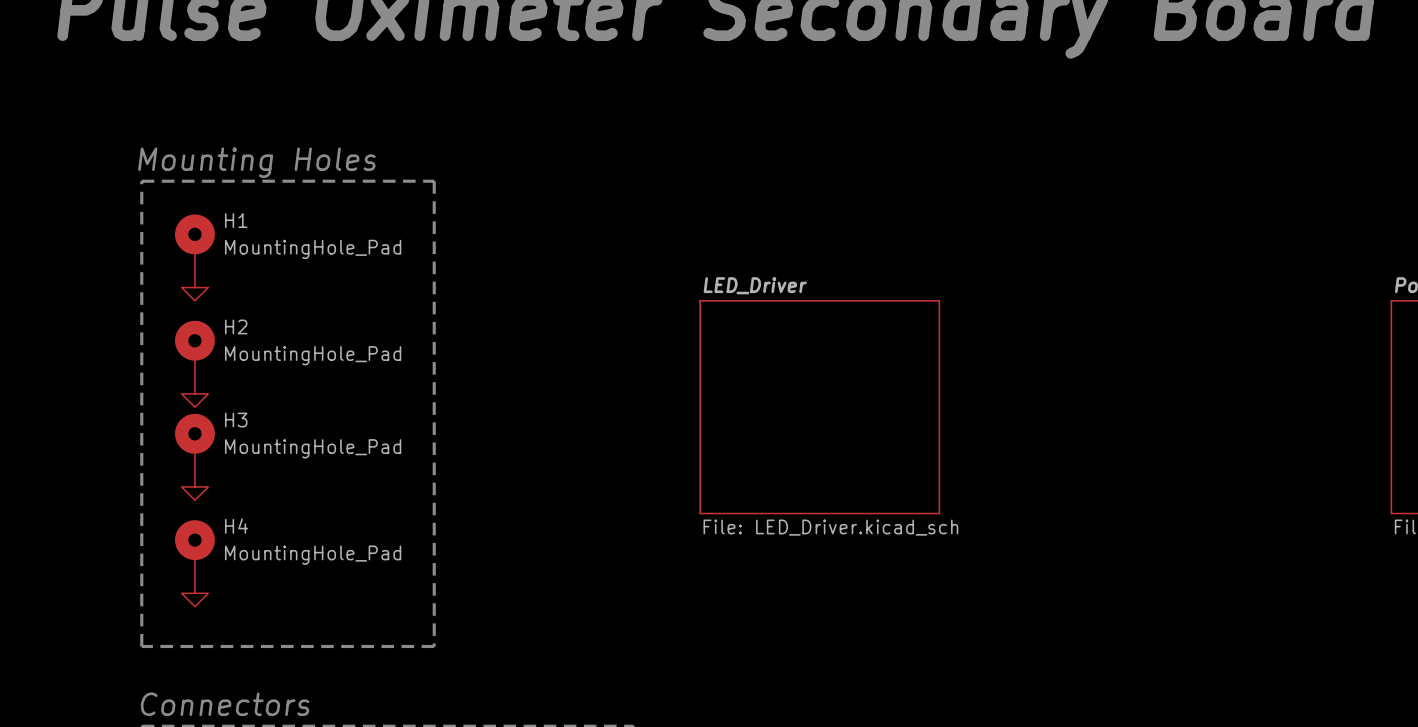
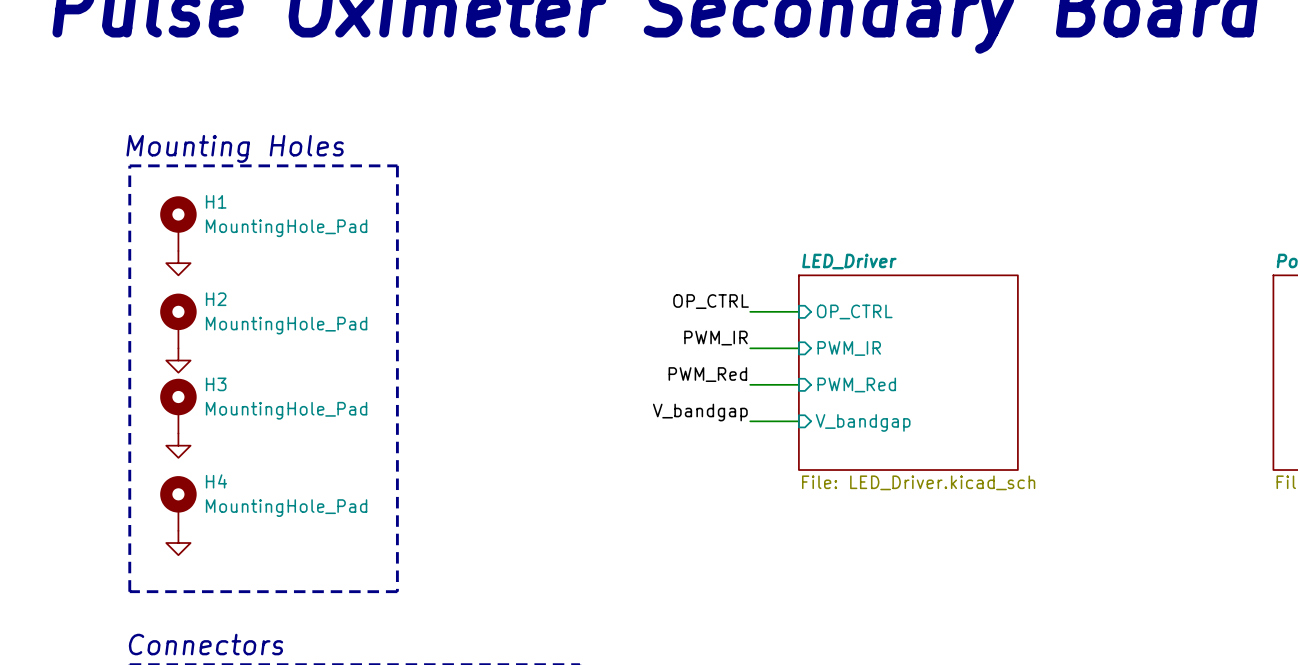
label: none -> OP_CTRL (711, 301)
wire: none -> (750, 311) (798, 311)
sheet pin: none -> OP_CTRL (854, 311)
label: none -> PWM_IR (715, 338)
wire: none -> (750, 348) (798, 348)
sheet pin: none -> PWM_IR (849, 348)
sheet LED_Driver position: (819, 407) -> (908, 372)
label: none -> PWM_Red (707, 374)
wire: none -> (750, 384) (798, 384)
sheet pin: none -> PWM_Red (856, 384)
label: none -> V_bandgap (700, 412)
wire: none -> (750, 421) (798, 421)
sheet pin: none -> V_bandgap (863, 422)

